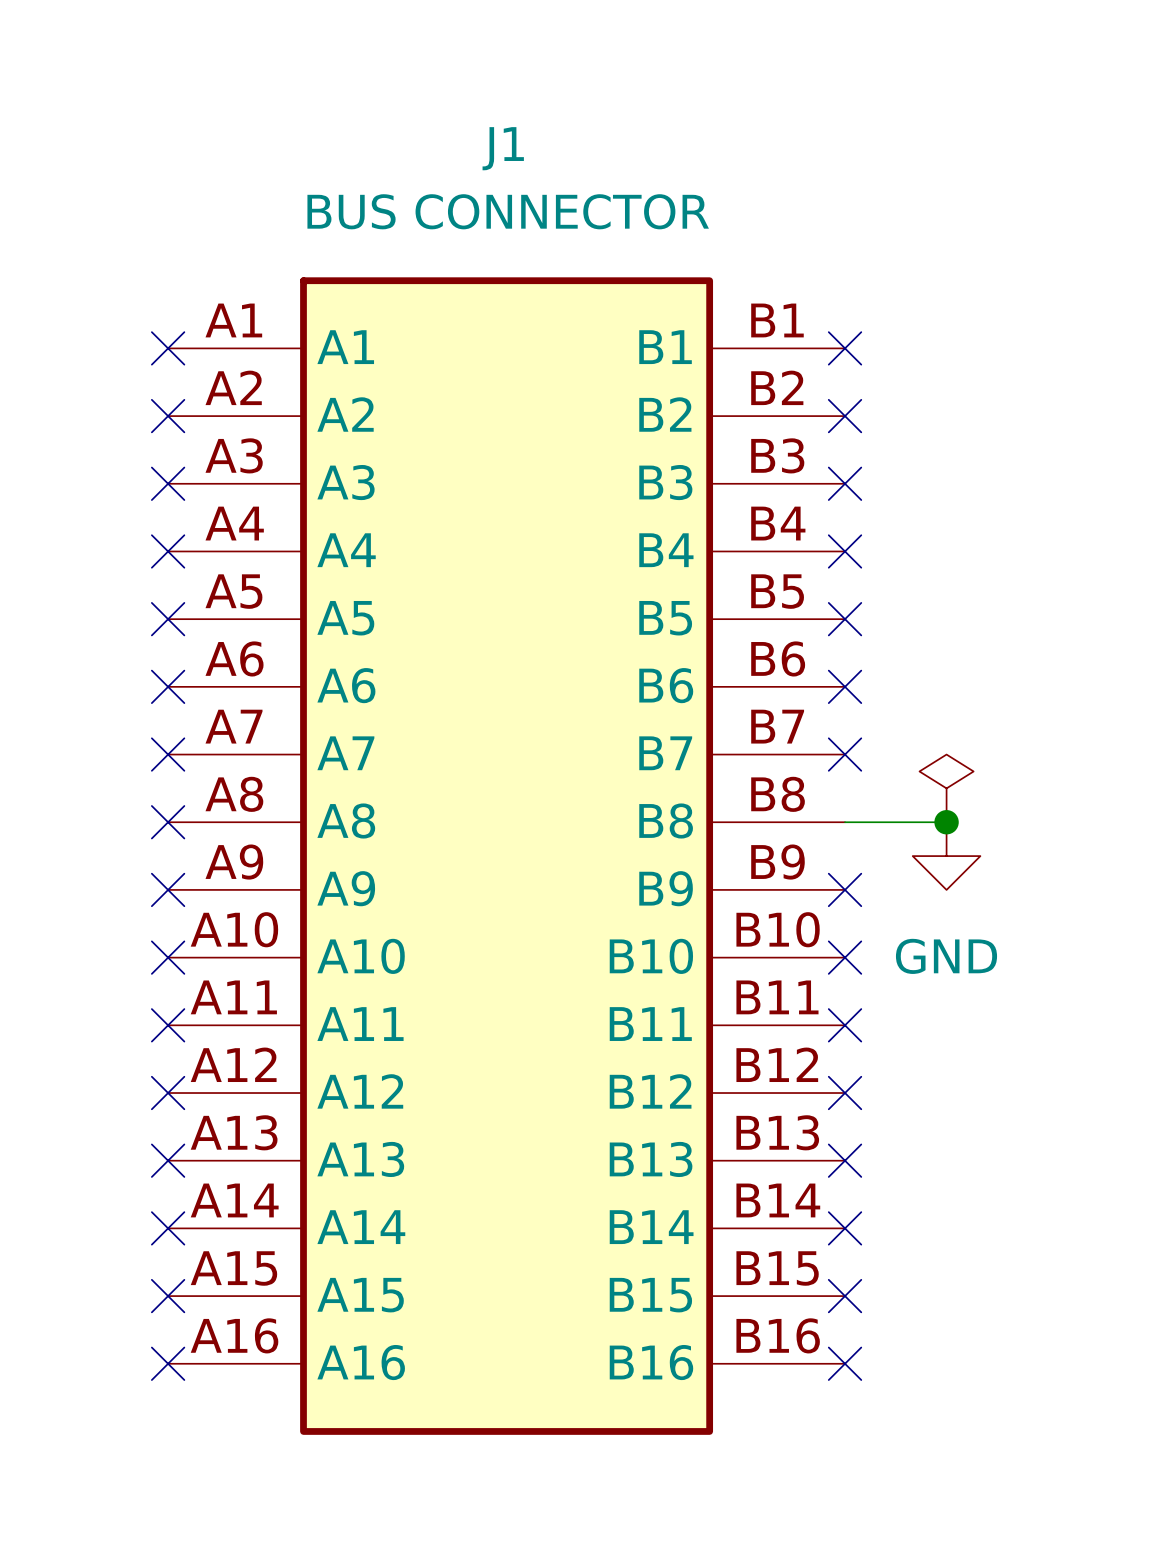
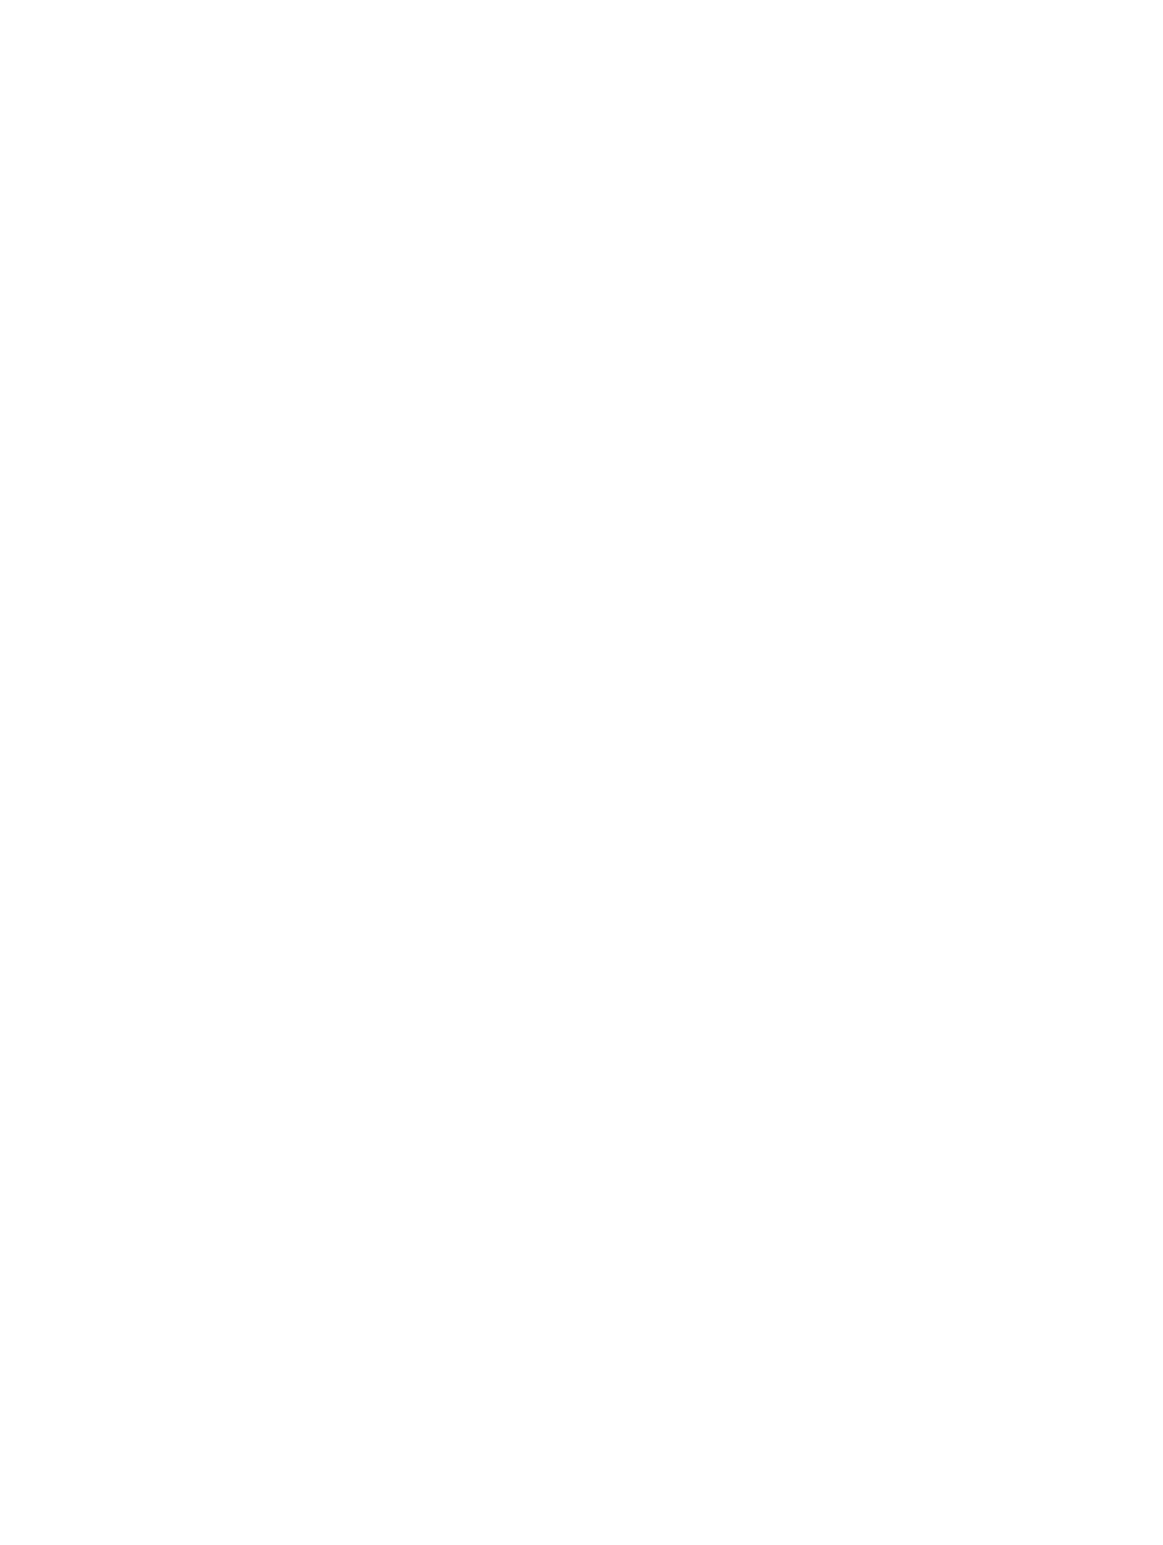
no-connect mark: (168, 348) -> none
no-connect mark: (845, 348) -> none
no-connect mark: (168, 416) -> none
no-connect mark: (845, 416) -> none
no-connect mark: (168, 483) -> none
no-connect mark: (845, 483) -> none
no-connect mark: (168, 551) -> none
no-connect mark: (845, 551) -> none
no-connect mark: (168, 619) -> none
no-connect mark: (845, 619) -> none
no-connect mark: (168, 686) -> none
no-connect mark: (845, 686) -> none
no-connect mark: (168, 754) -> none
no-connect mark: (845, 754) -> none
power symbol: (946, 788) -> none
no-connect mark: (168, 822) -> none
wire: (845, 822) (946, 822) -> none
junction: (946, 822) -> none
J1: BUS CONNECTOR (506, 856) -> none
power symbol: GND (946, 856) -> none
no-connect mark: (168, 889) -> none
no-connect mark: (845, 889) -> none
no-connect mark: (168, 957) -> none
no-connect mark: (845, 957) -> none
no-connect mark: (168, 1025) -> none
no-connect mark: (845, 1025) -> none
no-connect mark: (168, 1093) -> none
no-connect mark: (845, 1093) -> none
no-connect mark: (168, 1160) -> none
no-connect mark: (845, 1160) -> none
no-connect mark: (168, 1228) -> none
no-connect mark: (845, 1228) -> none
no-connect mark: (168, 1296) -> none
no-connect mark: (845, 1296) -> none
no-connect mark: (168, 1363) -> none
no-connect mark: (845, 1363) -> none

